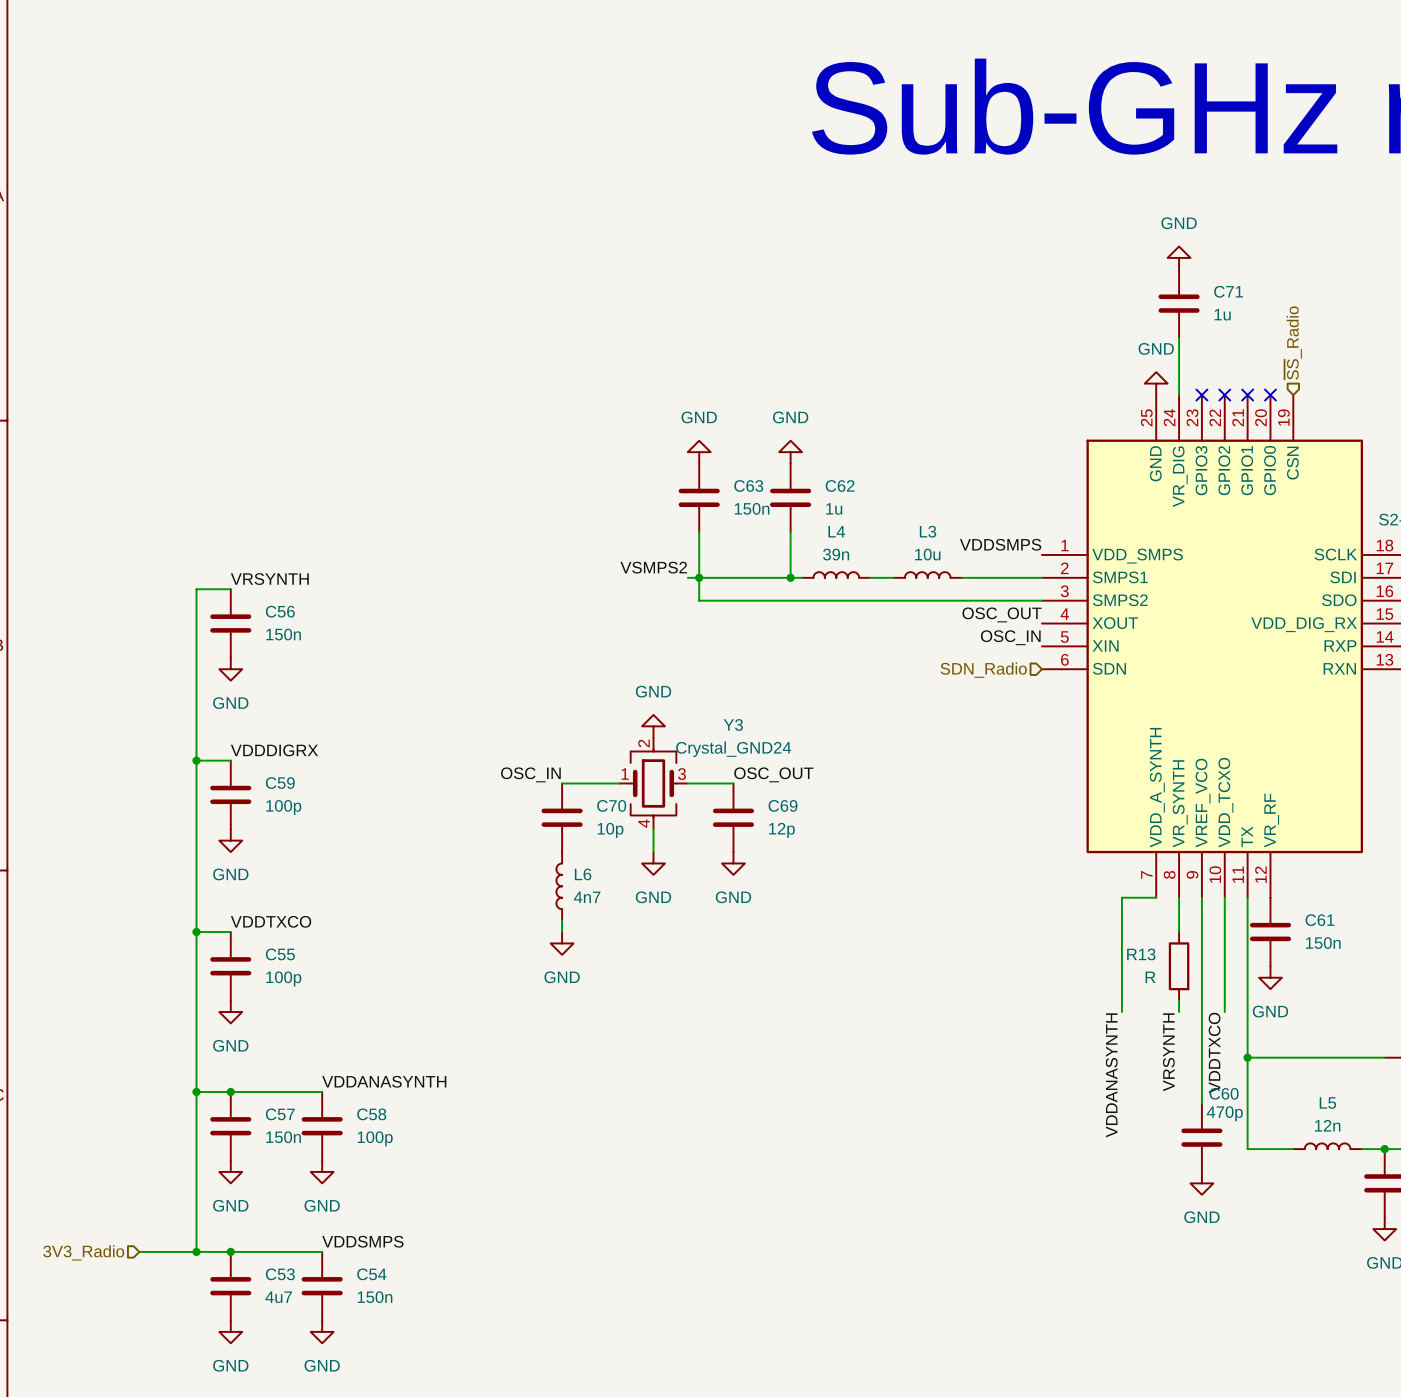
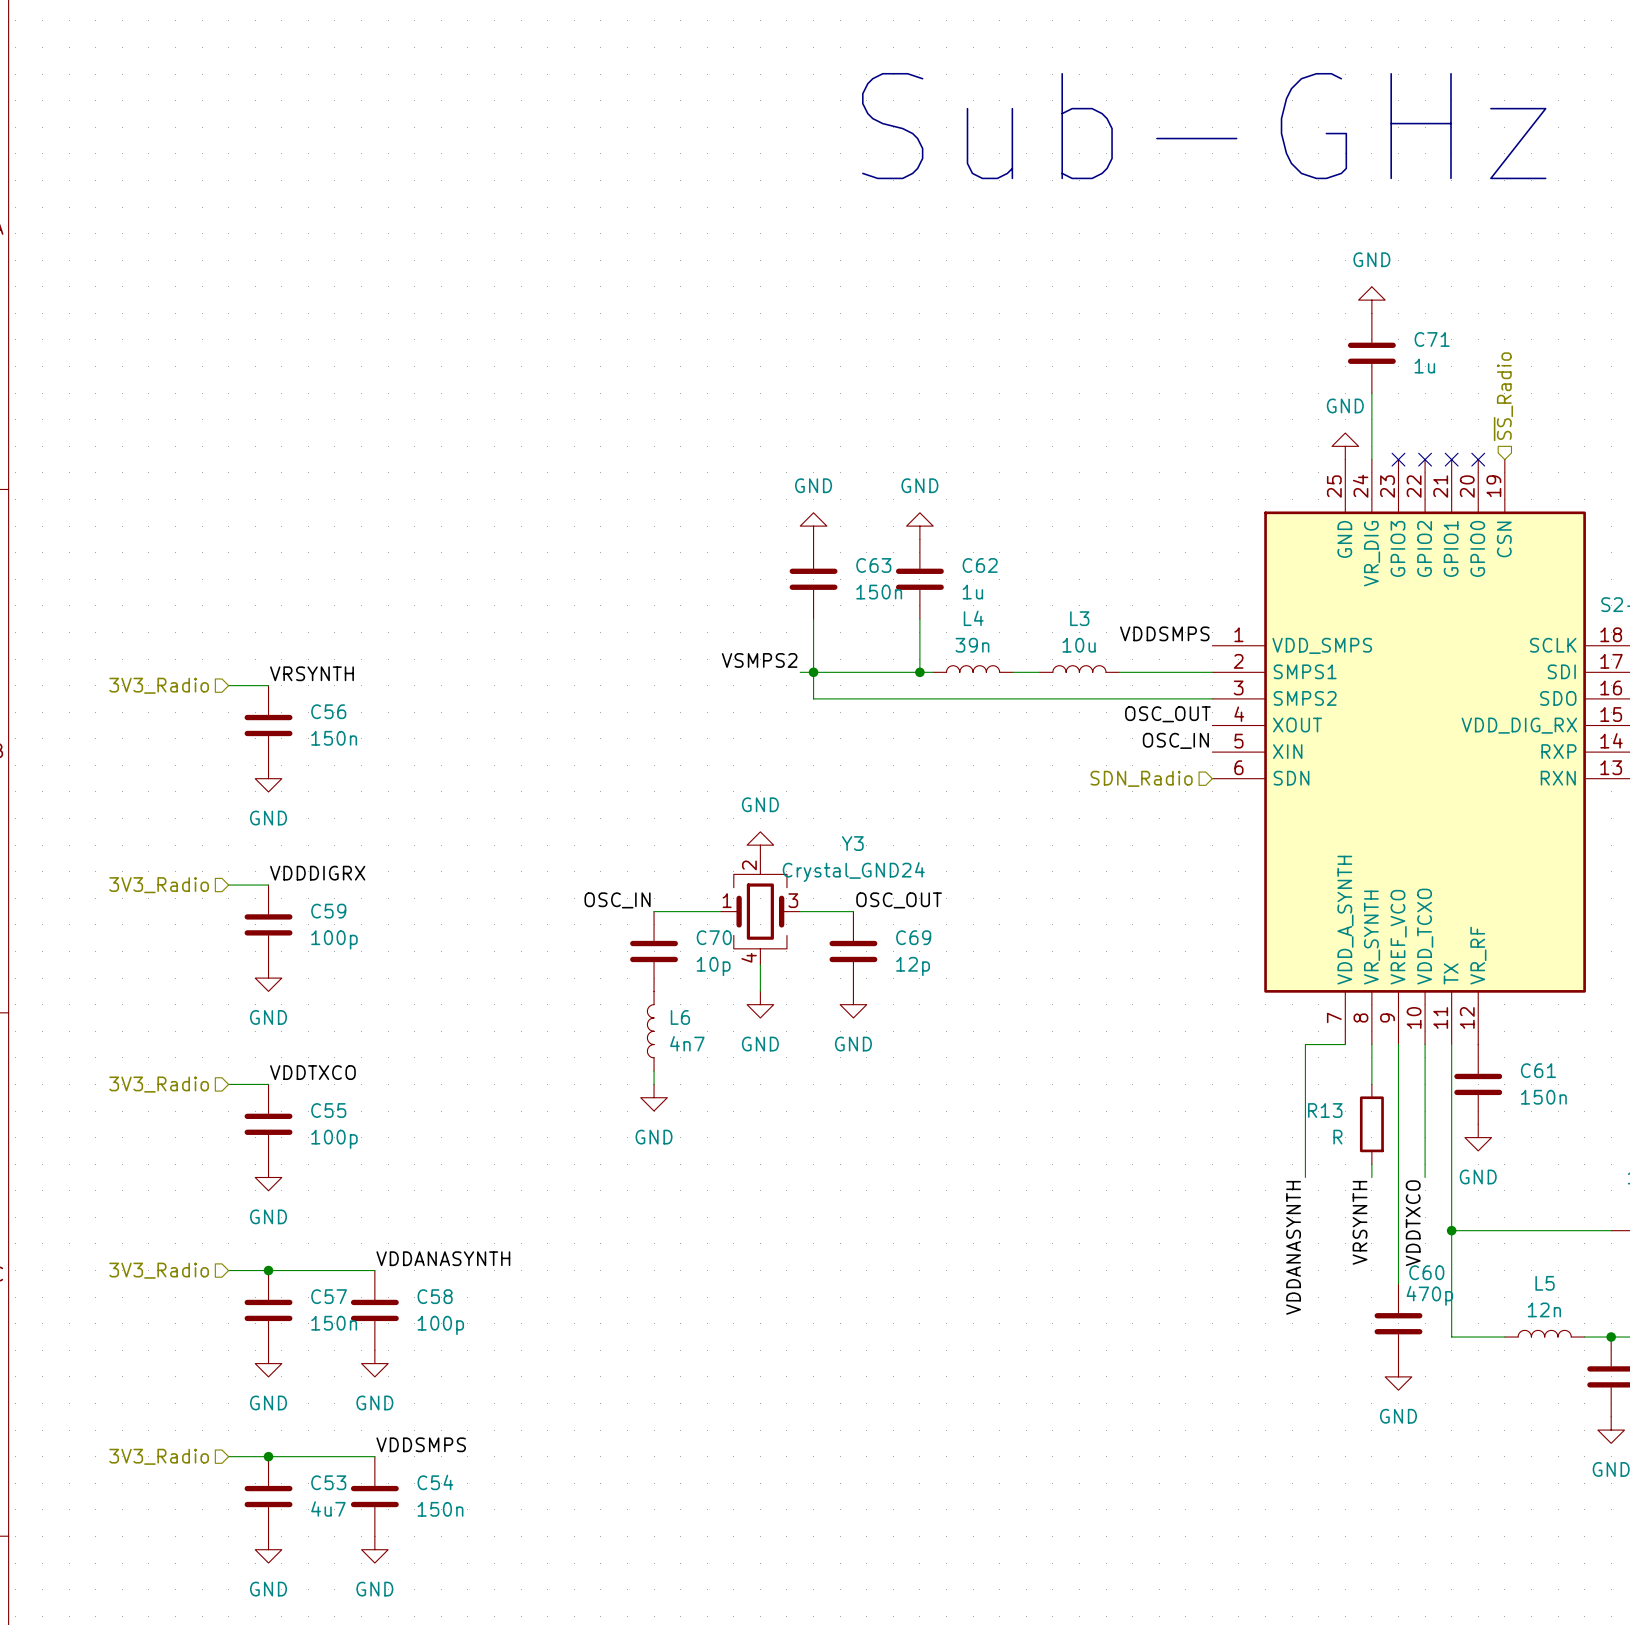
wire: (196, 589) (196, 1251) (139, 1251) -> none
hierarchical label: none -> 3V3_Radio (159, 685)
junction: (196, 760) -> none
hierarchical label: none -> 3V3_Radio (159, 885)
hierarchical label: none -> 3V3_Radio (159, 1084)
junction: (196, 932) -> none
junction: (196, 1091) -> none
hierarchical label: none -> 3V3_Radio (159, 1270)
junction: (196, 1251) -> none
hierarchical label position: 3V3_Radio (83, 1252) -> 3V3_Radio (159, 1456)

